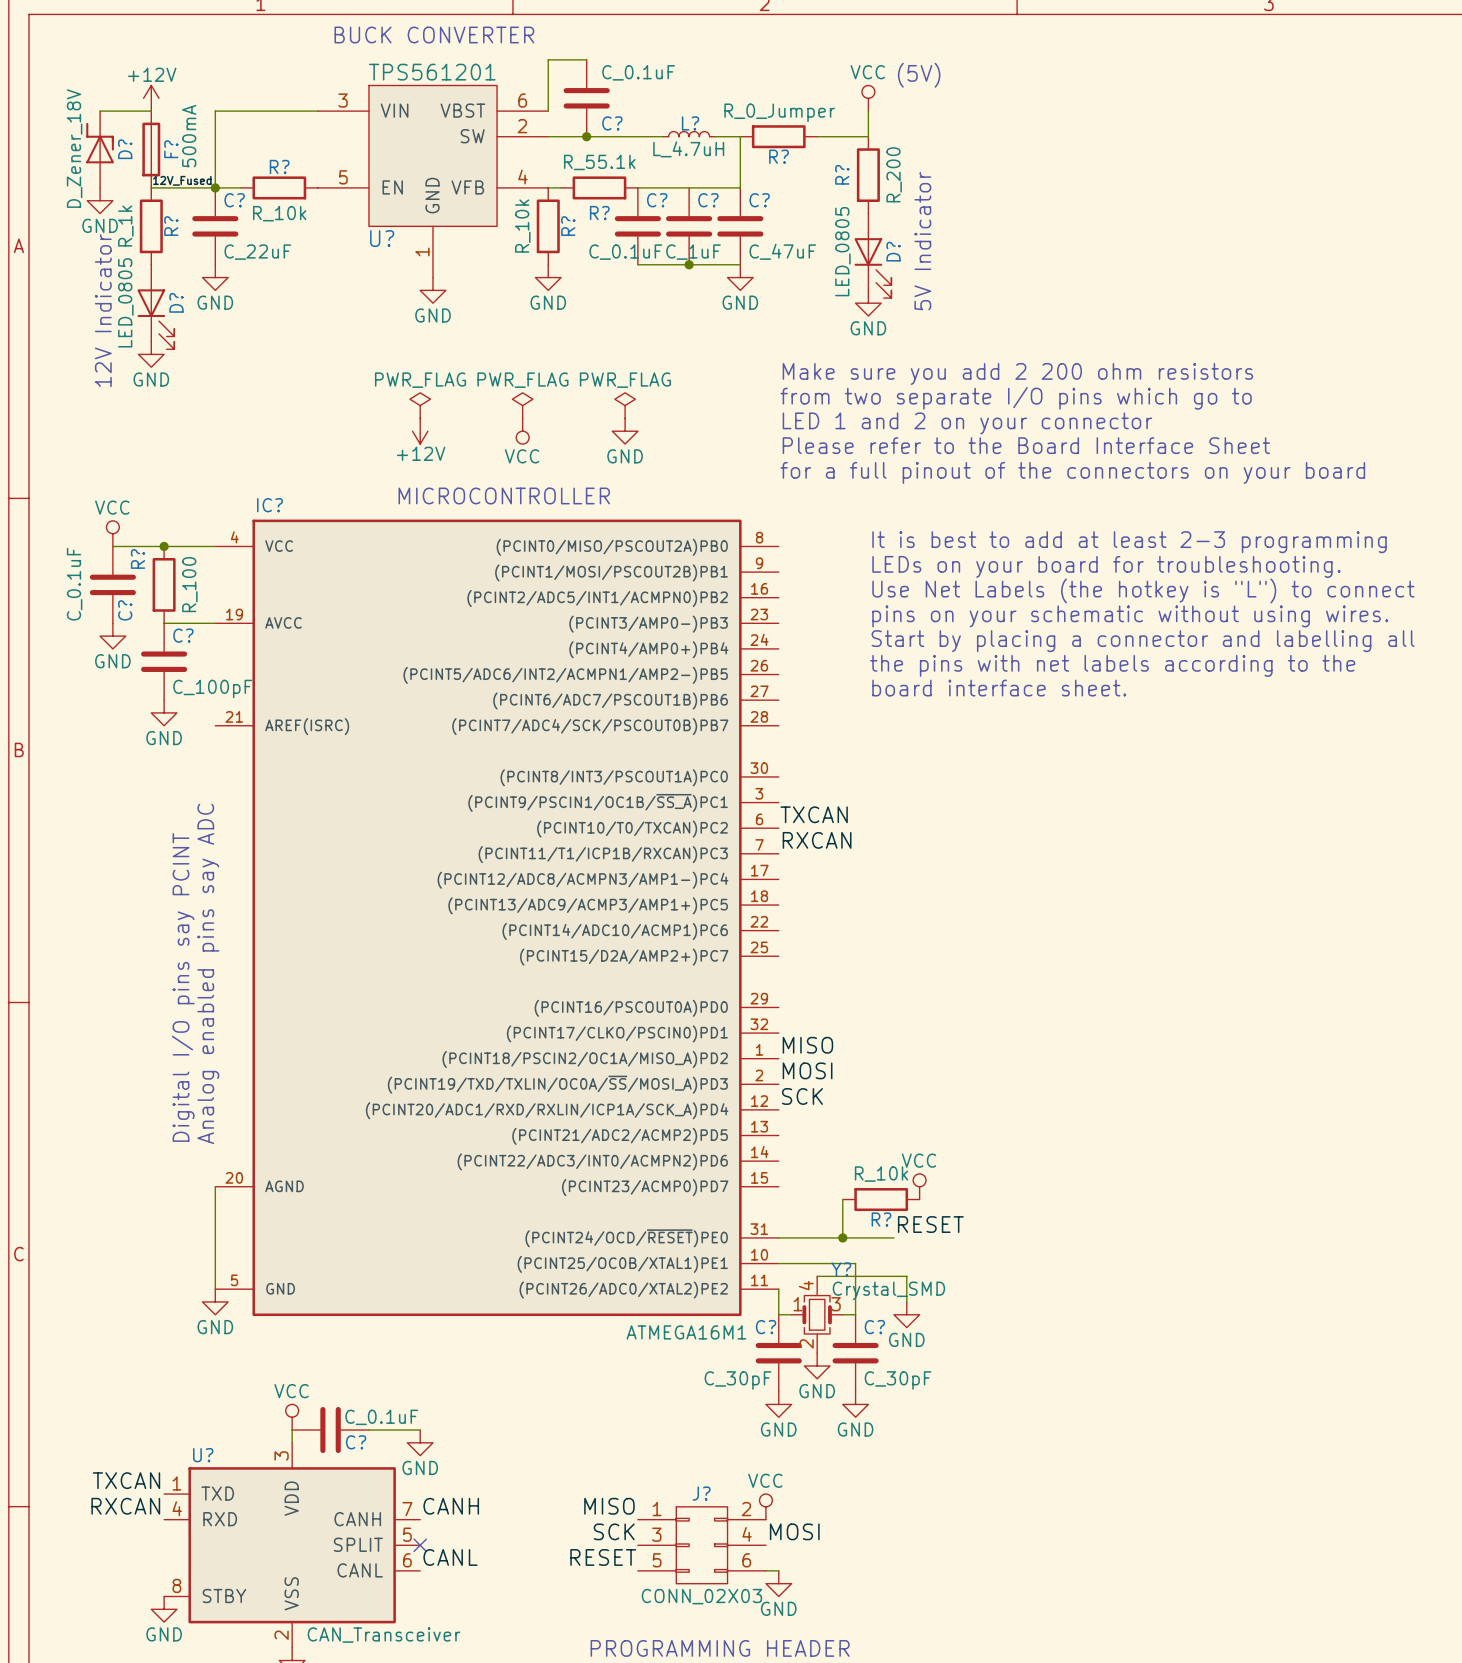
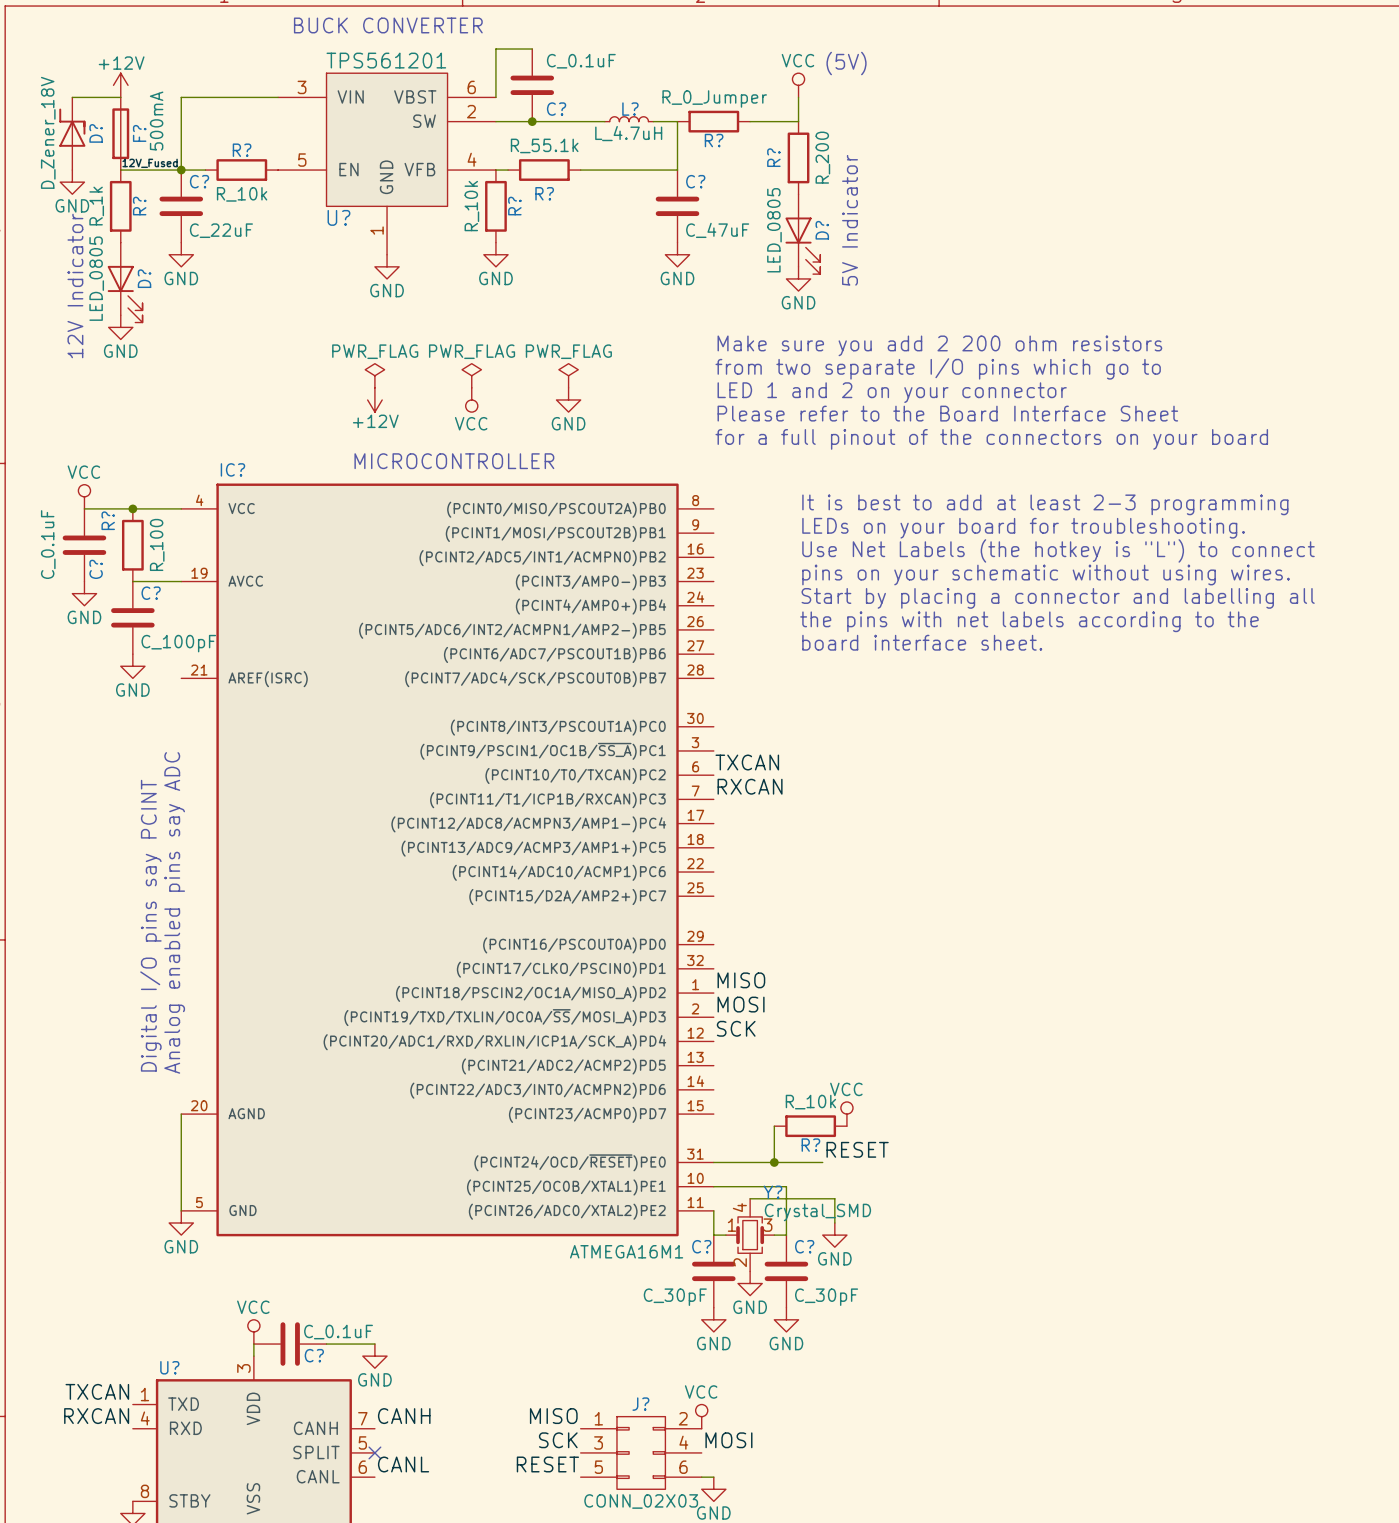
C?: C_0.1uF (637, 226) -> none
C?: C_1uF (689, 226) -> none
wire: (637, 264) (740, 264) -> none
junction: (689, 264) -> none

